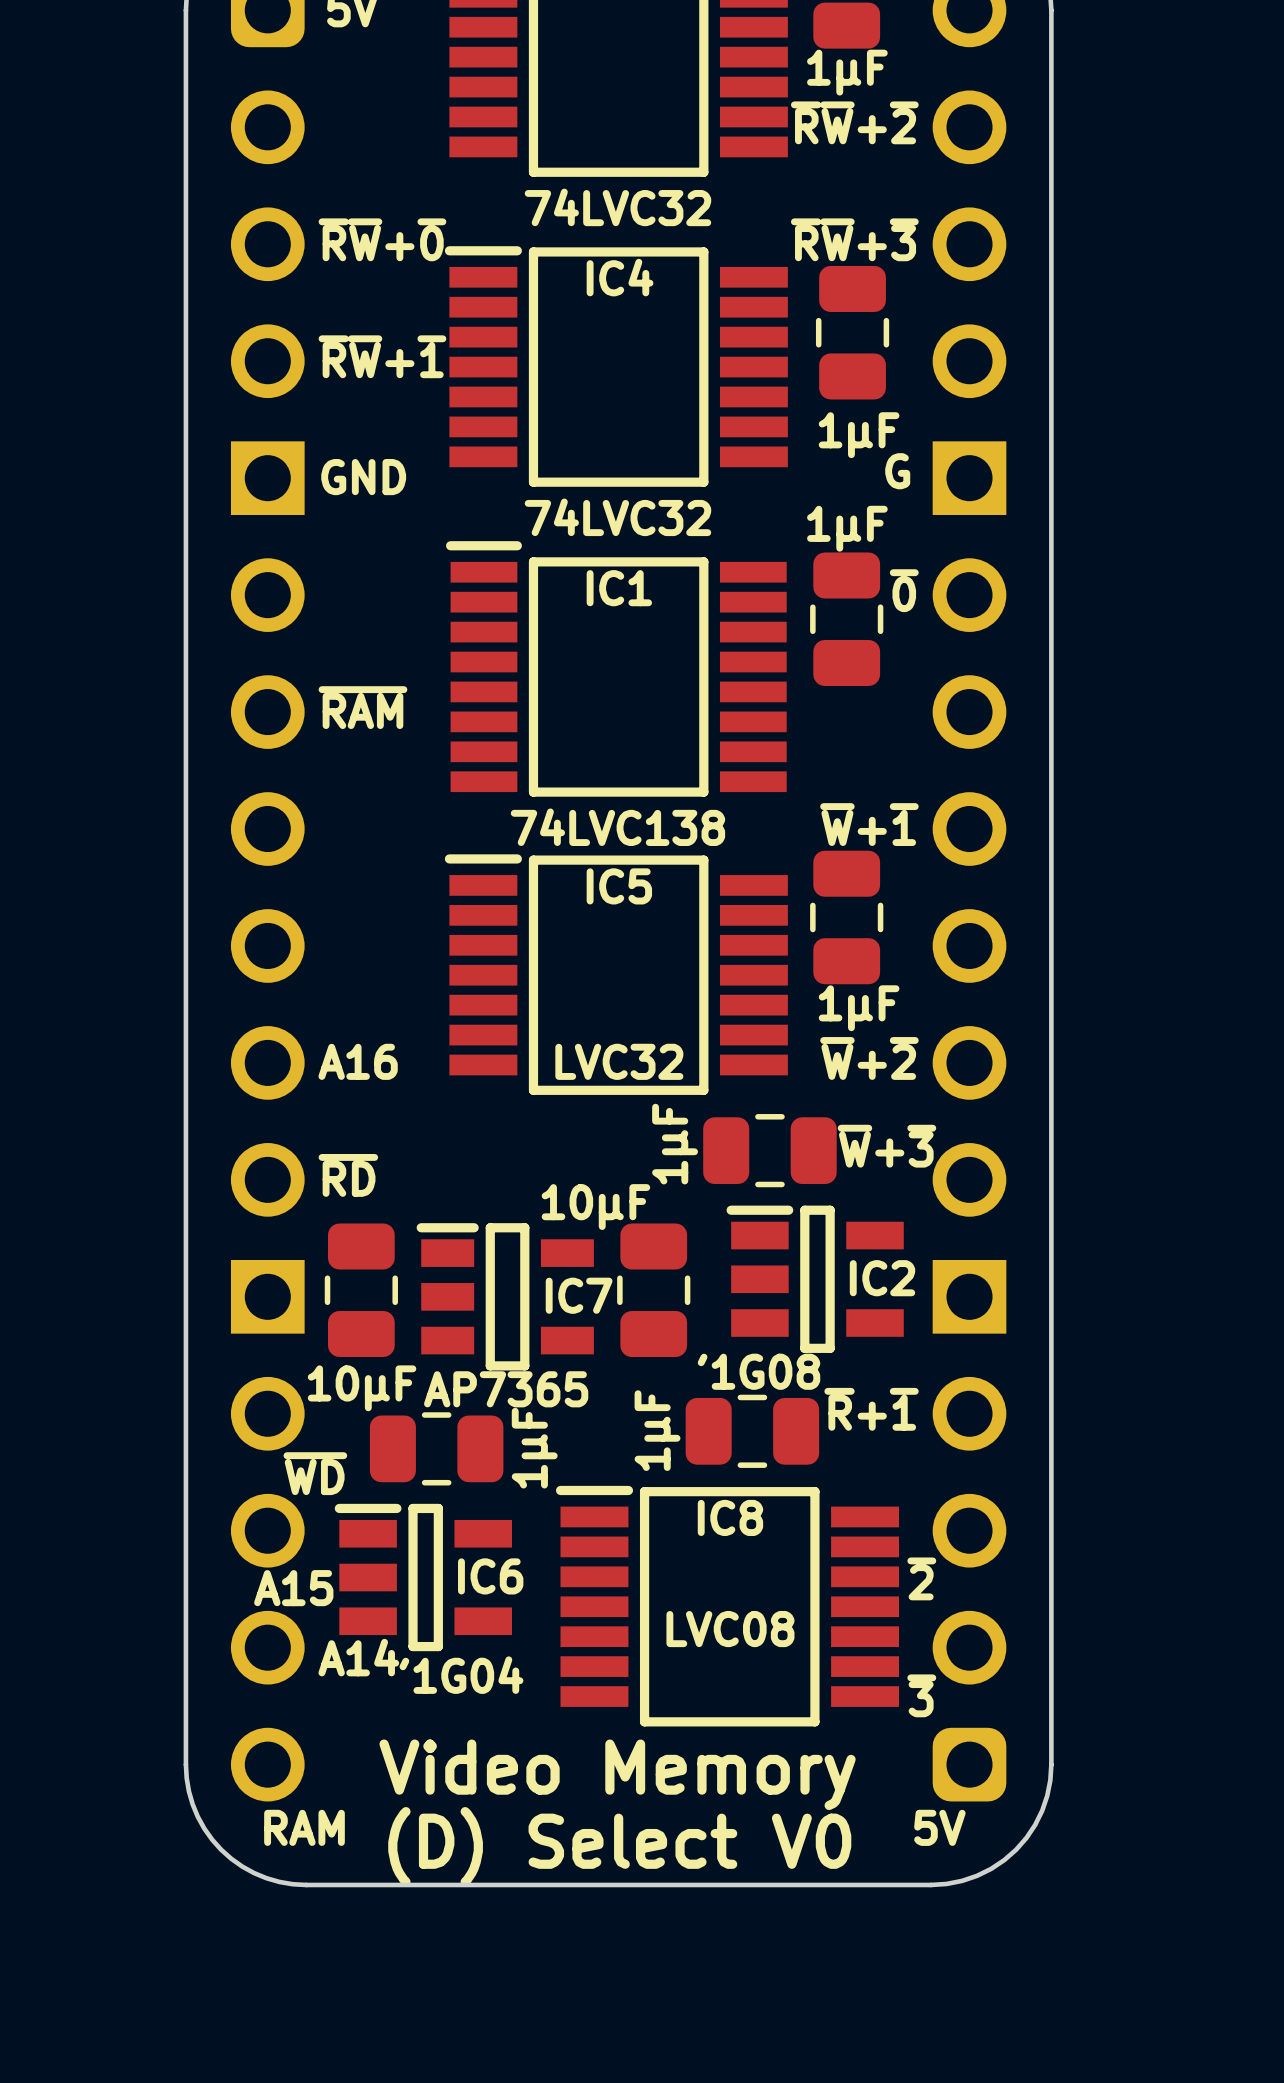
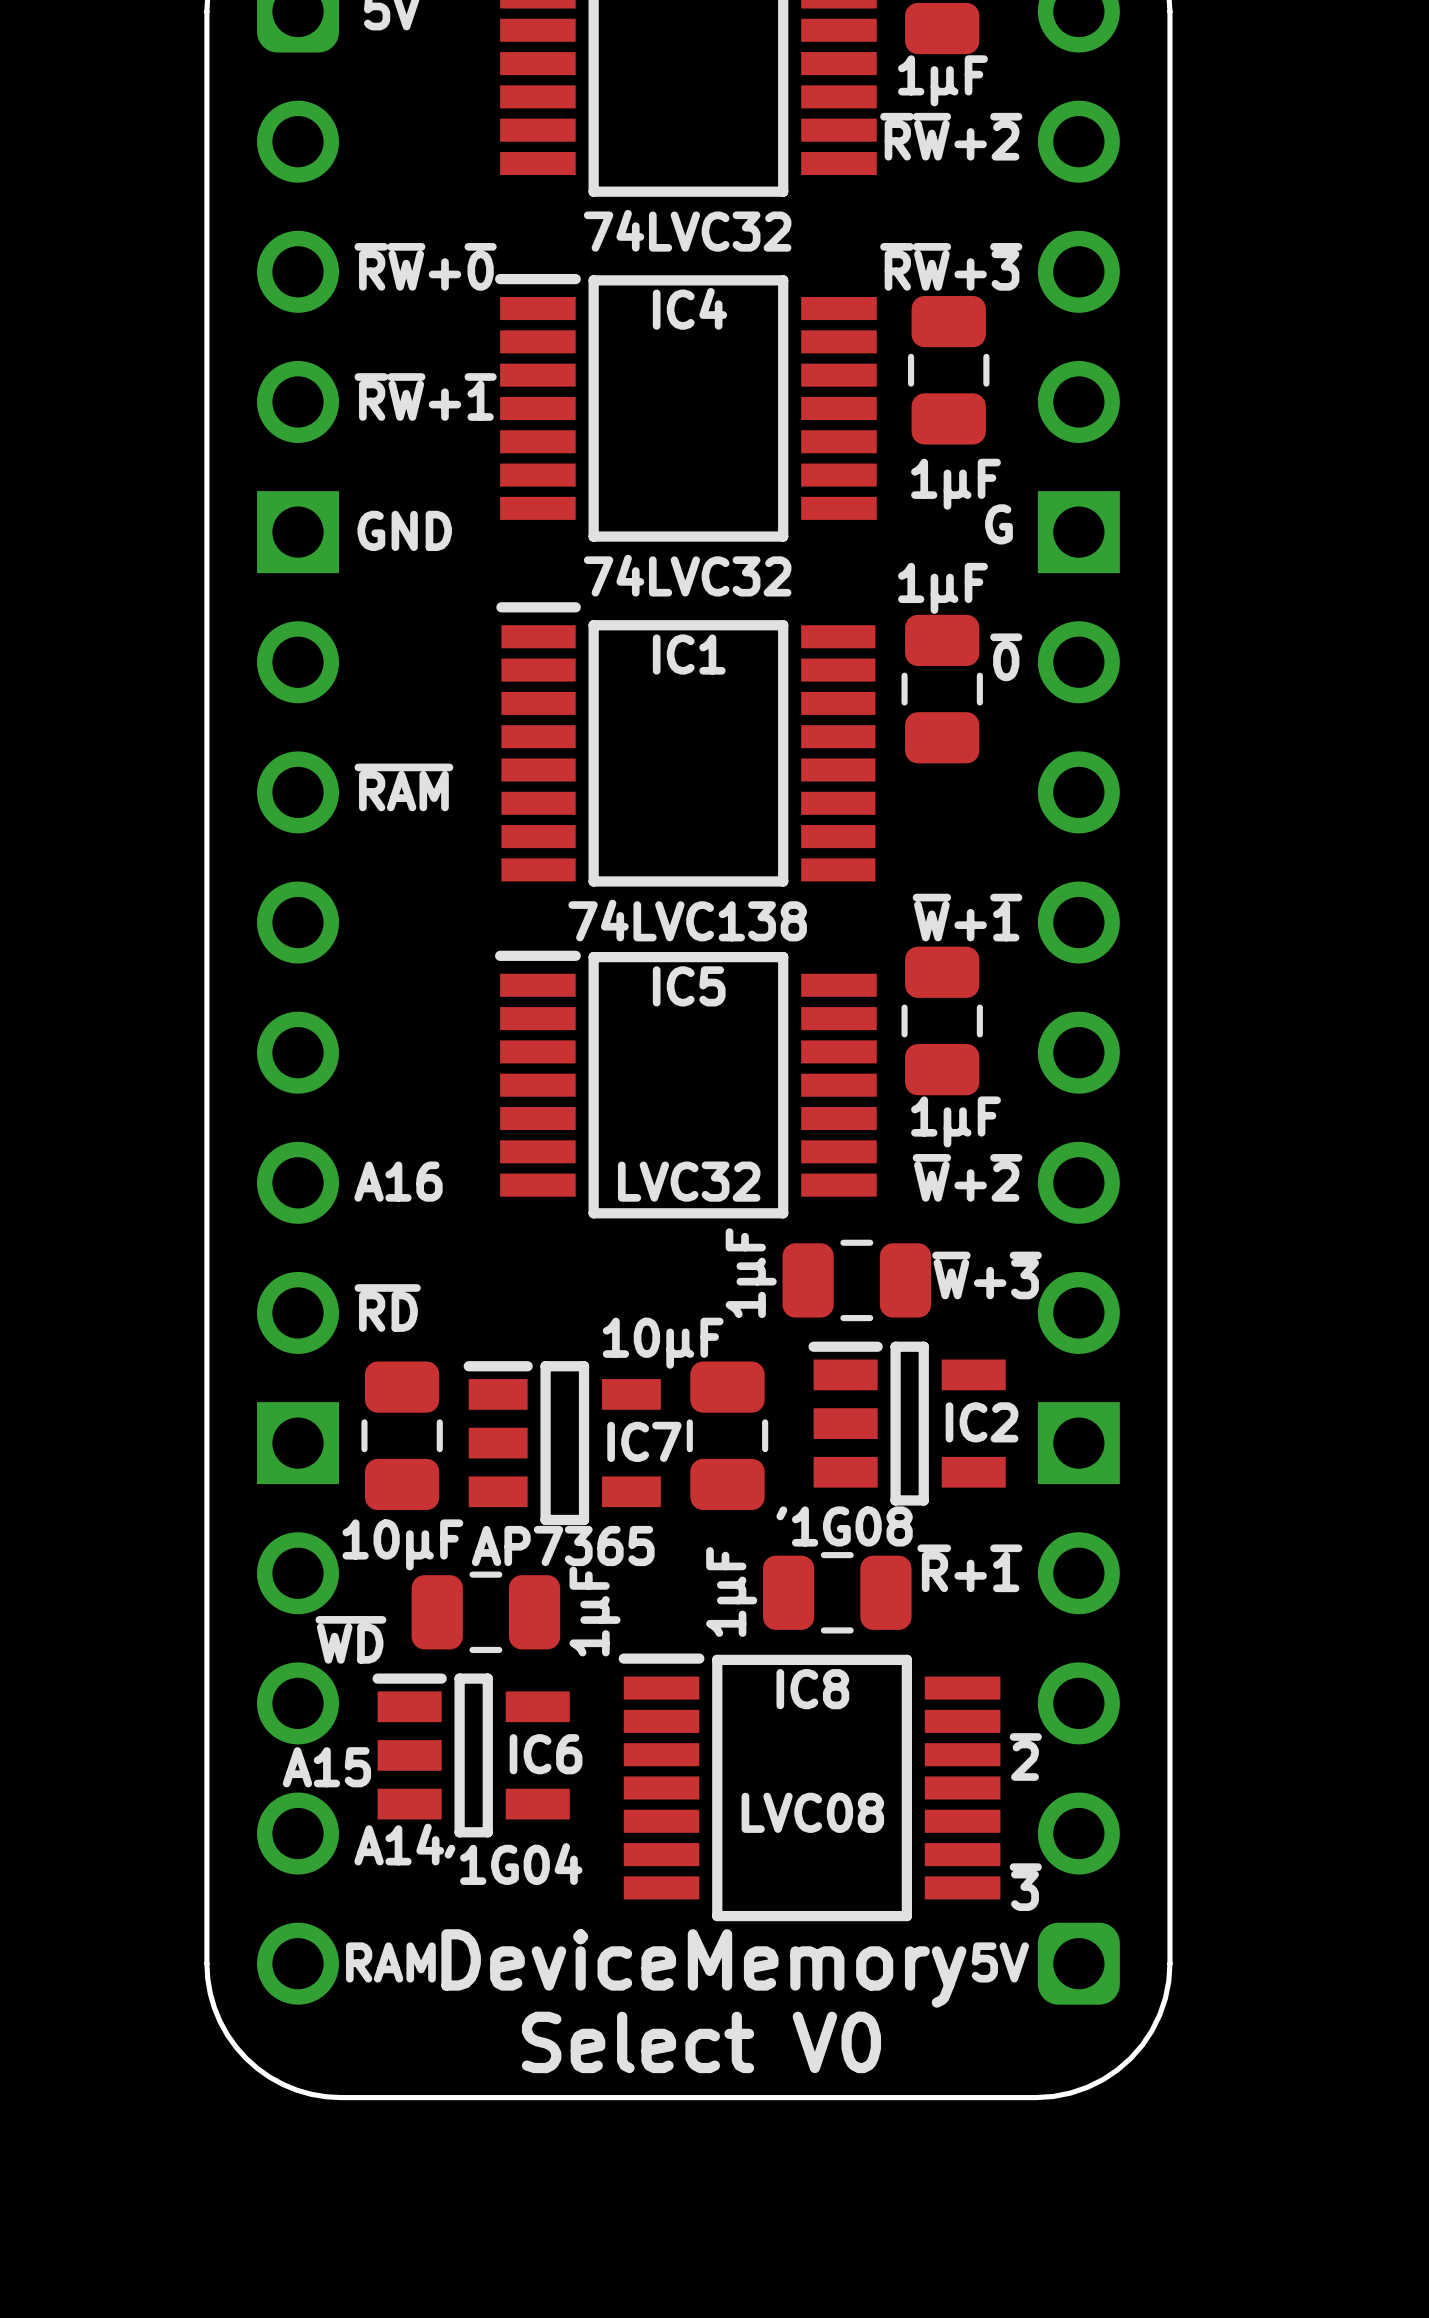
text: Video Memory (617, 1774) -> DeviceMemory (703, 1968)
text position: RAM (304, 1827) -> RAM (390, 1962)
text position: 5V (939, 1827) -> 5V (1000, 1962)
text: (D) Select V0 (619, 1846) -> Select V0 (701, 2042)

